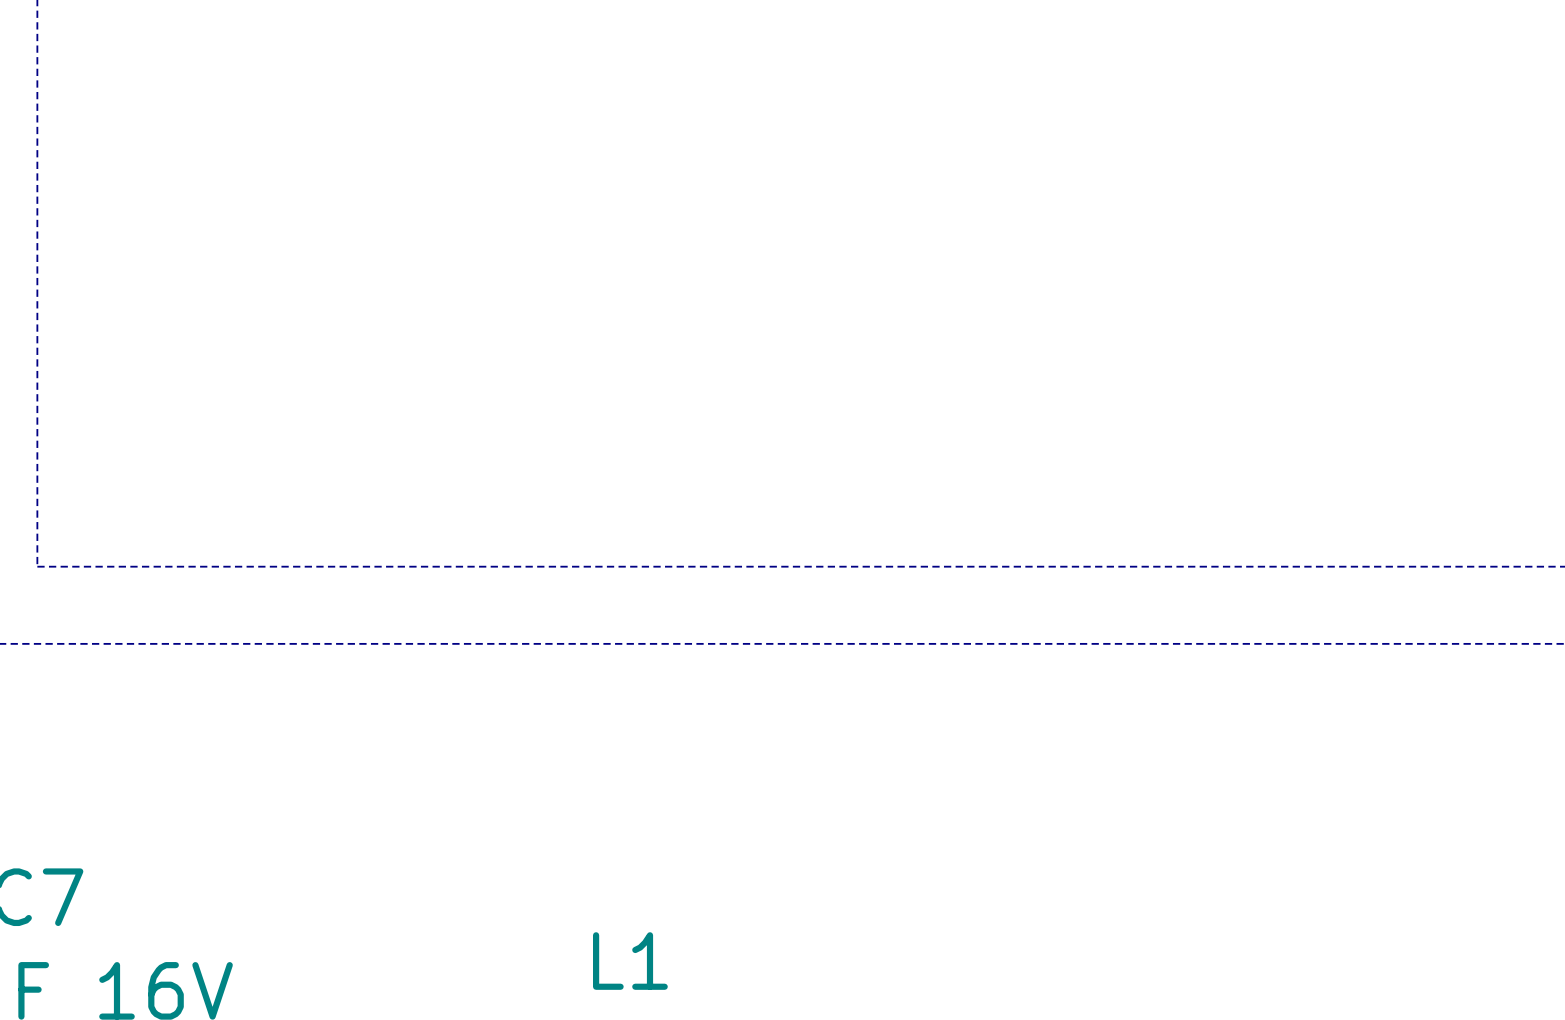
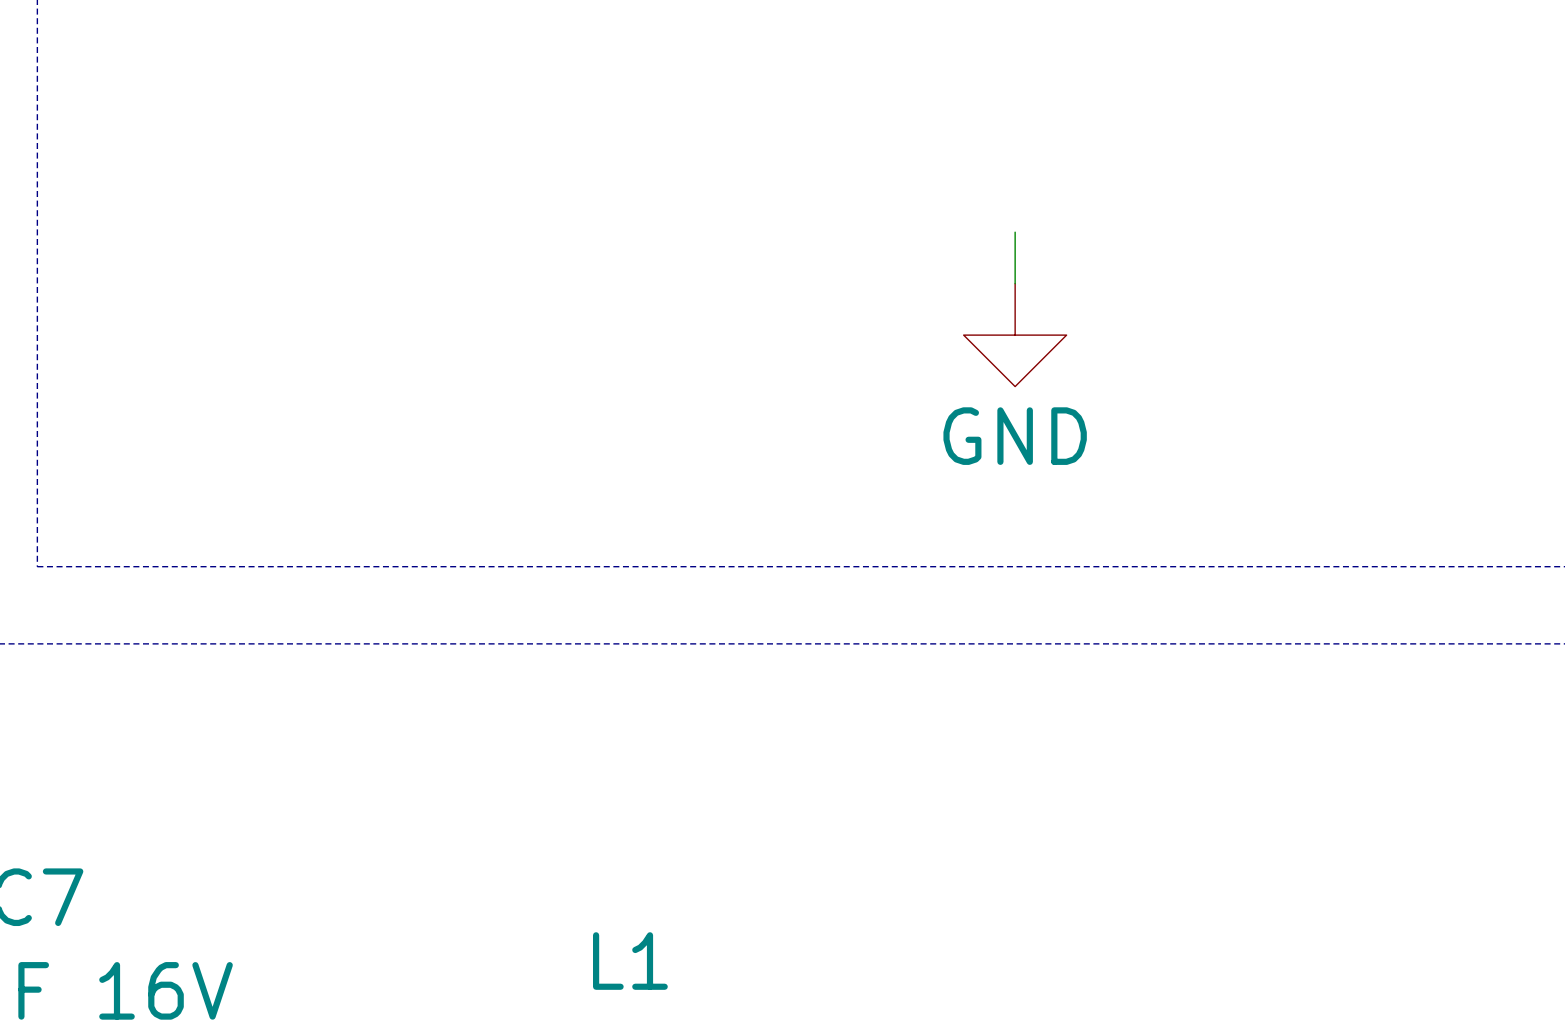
wire: none -> (1015, 232) (1015, 283)
power symbol: none -> GND (1015, 335)

